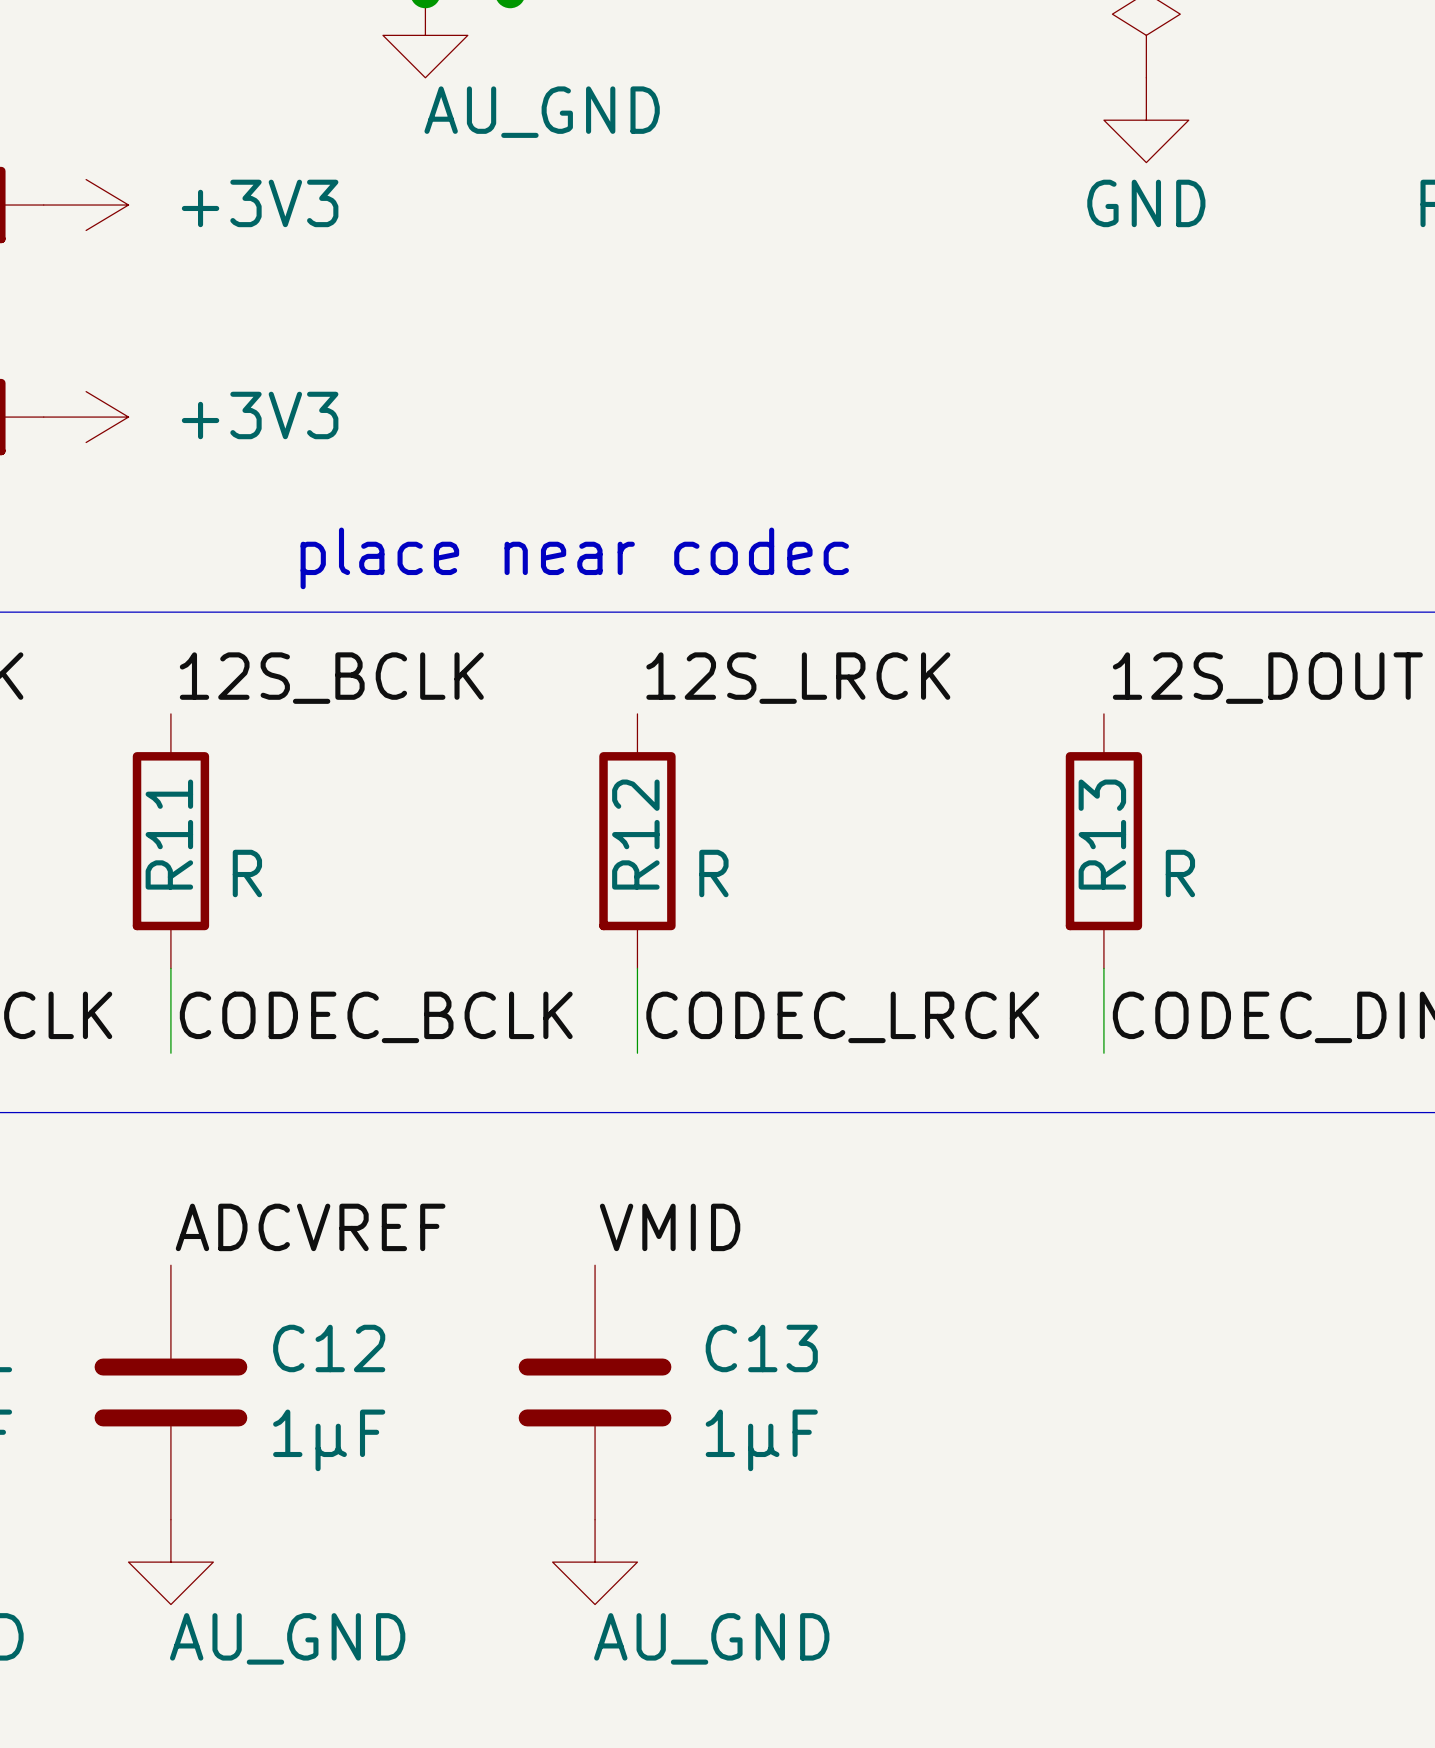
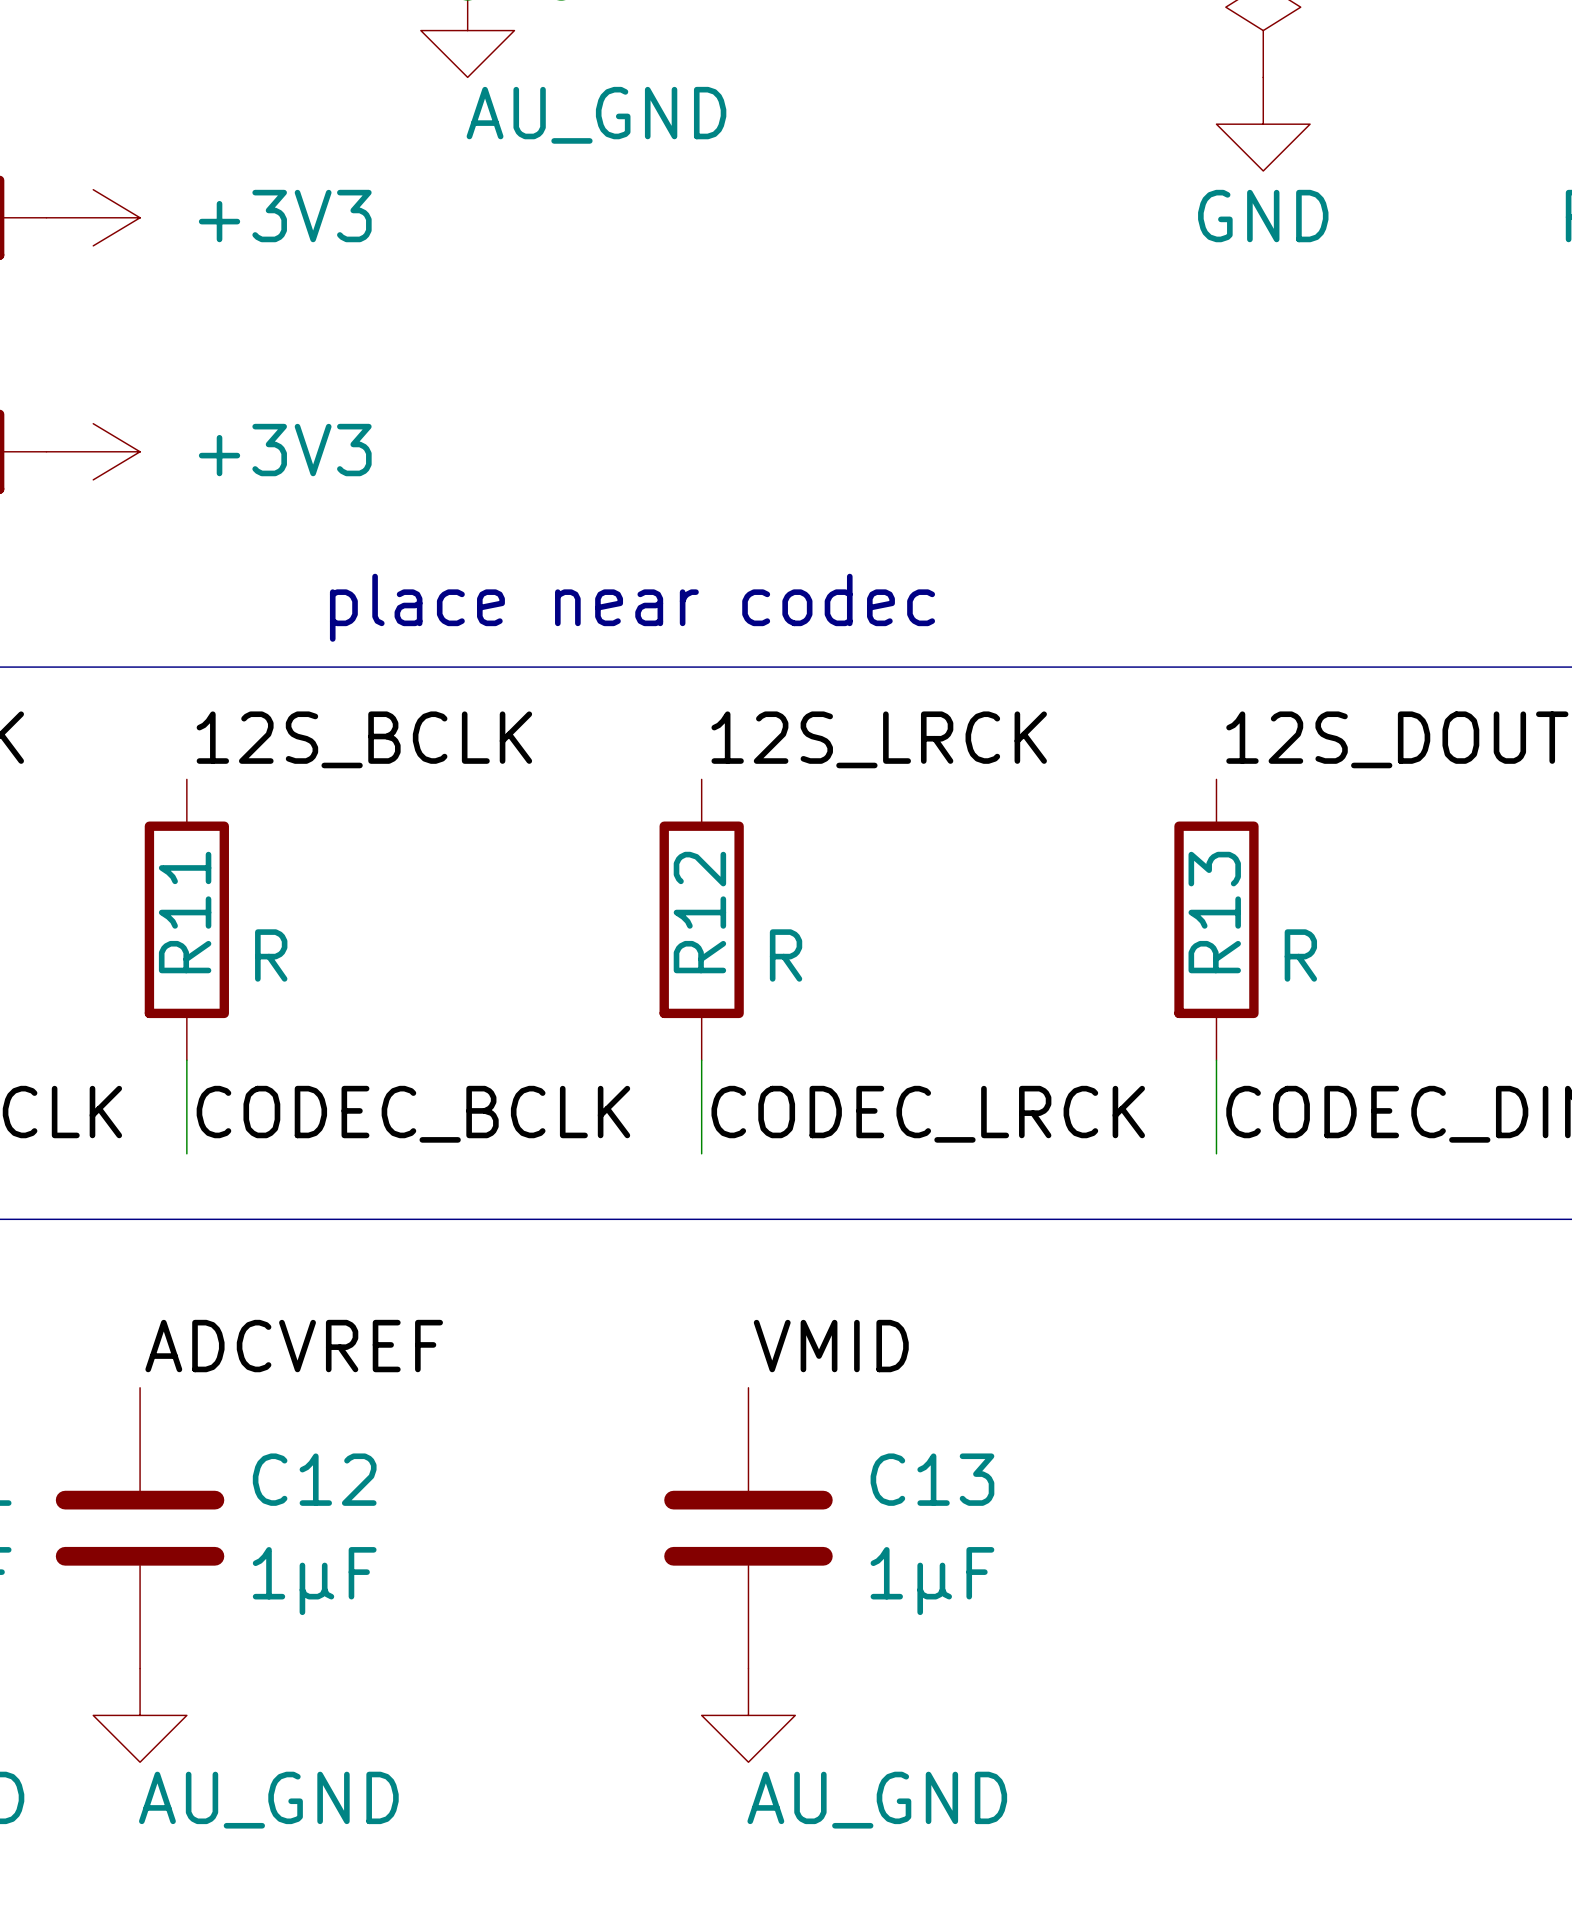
label position: ADCVREF (310, 1227) -> ADCVREF (294, 1346)
label position: VMID (670, 1227) -> VMID (831, 1346)
C12 position: (170, 1392) -> (140, 1528)
C13 position: (595, 1392) -> (748, 1528)
power symbol position: AU_GND (170, 1562) -> AU_GND (140, 1715)
power symbol position: AU_GND (595, 1562) -> AU_GND (748, 1715)

